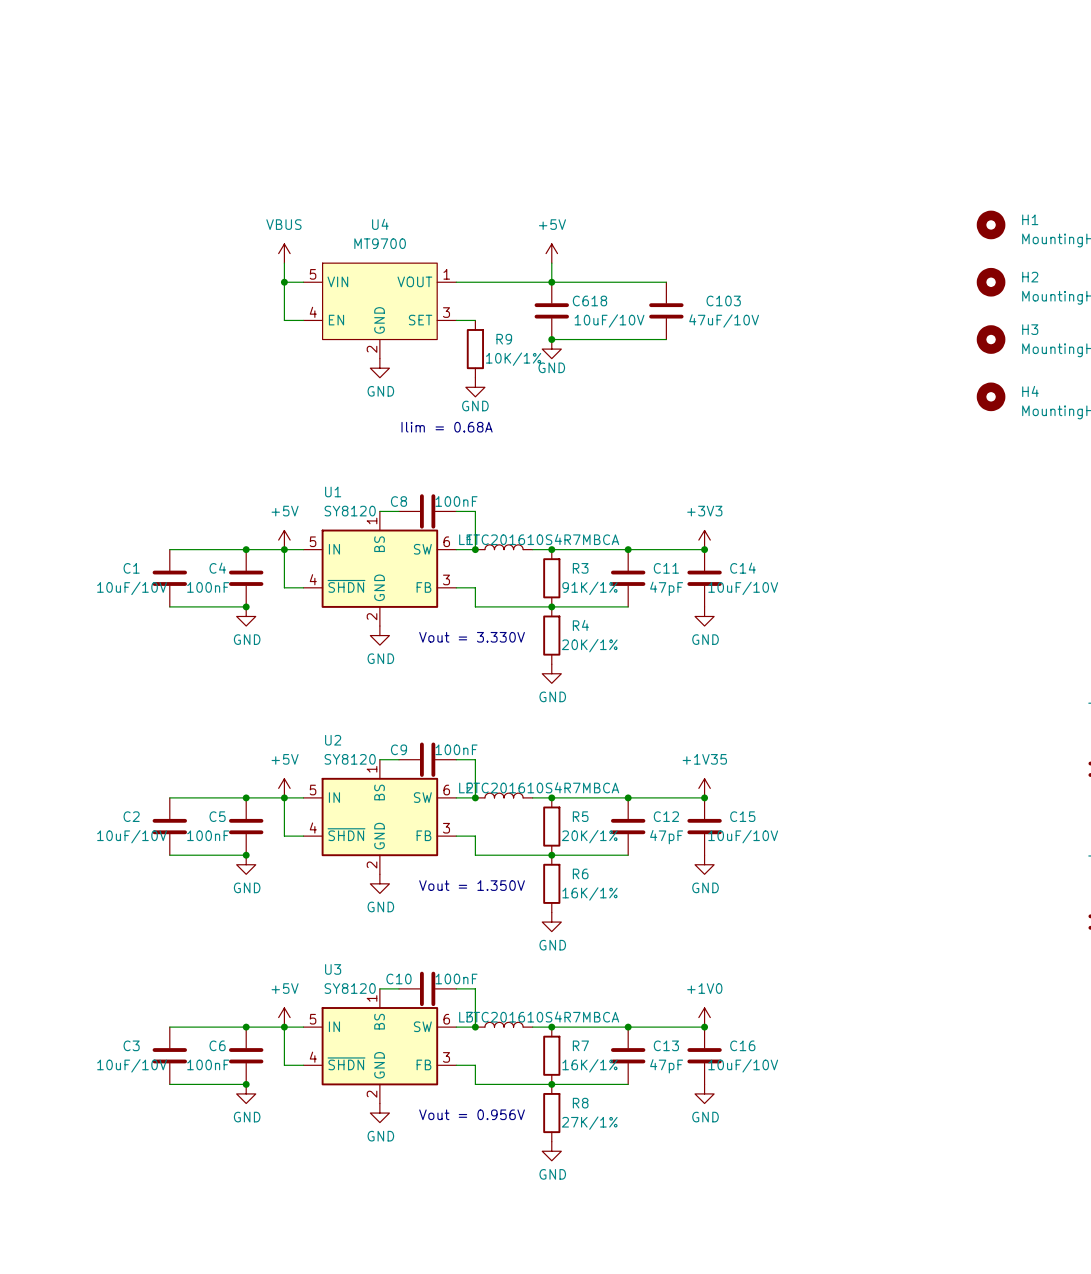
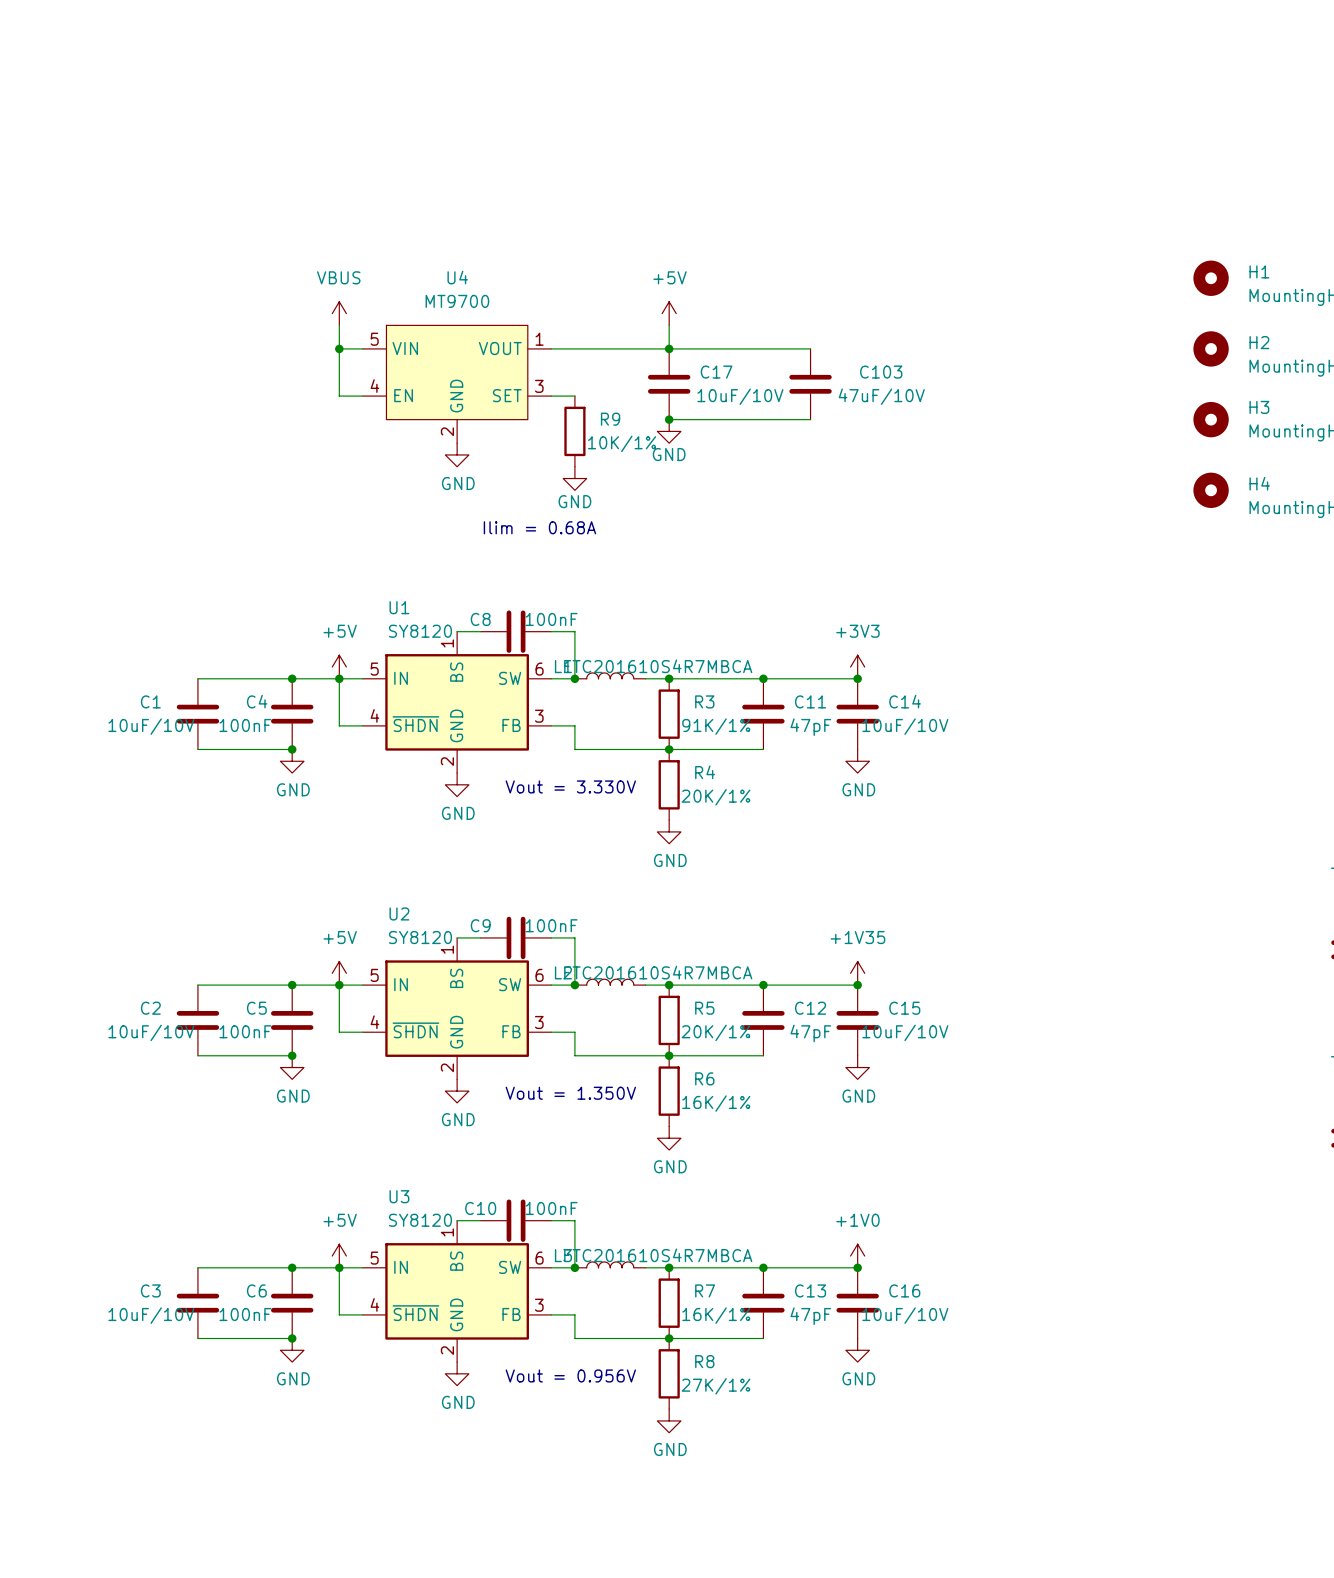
C618 name: C618 (589, 300) -> C17 (716, 372)

